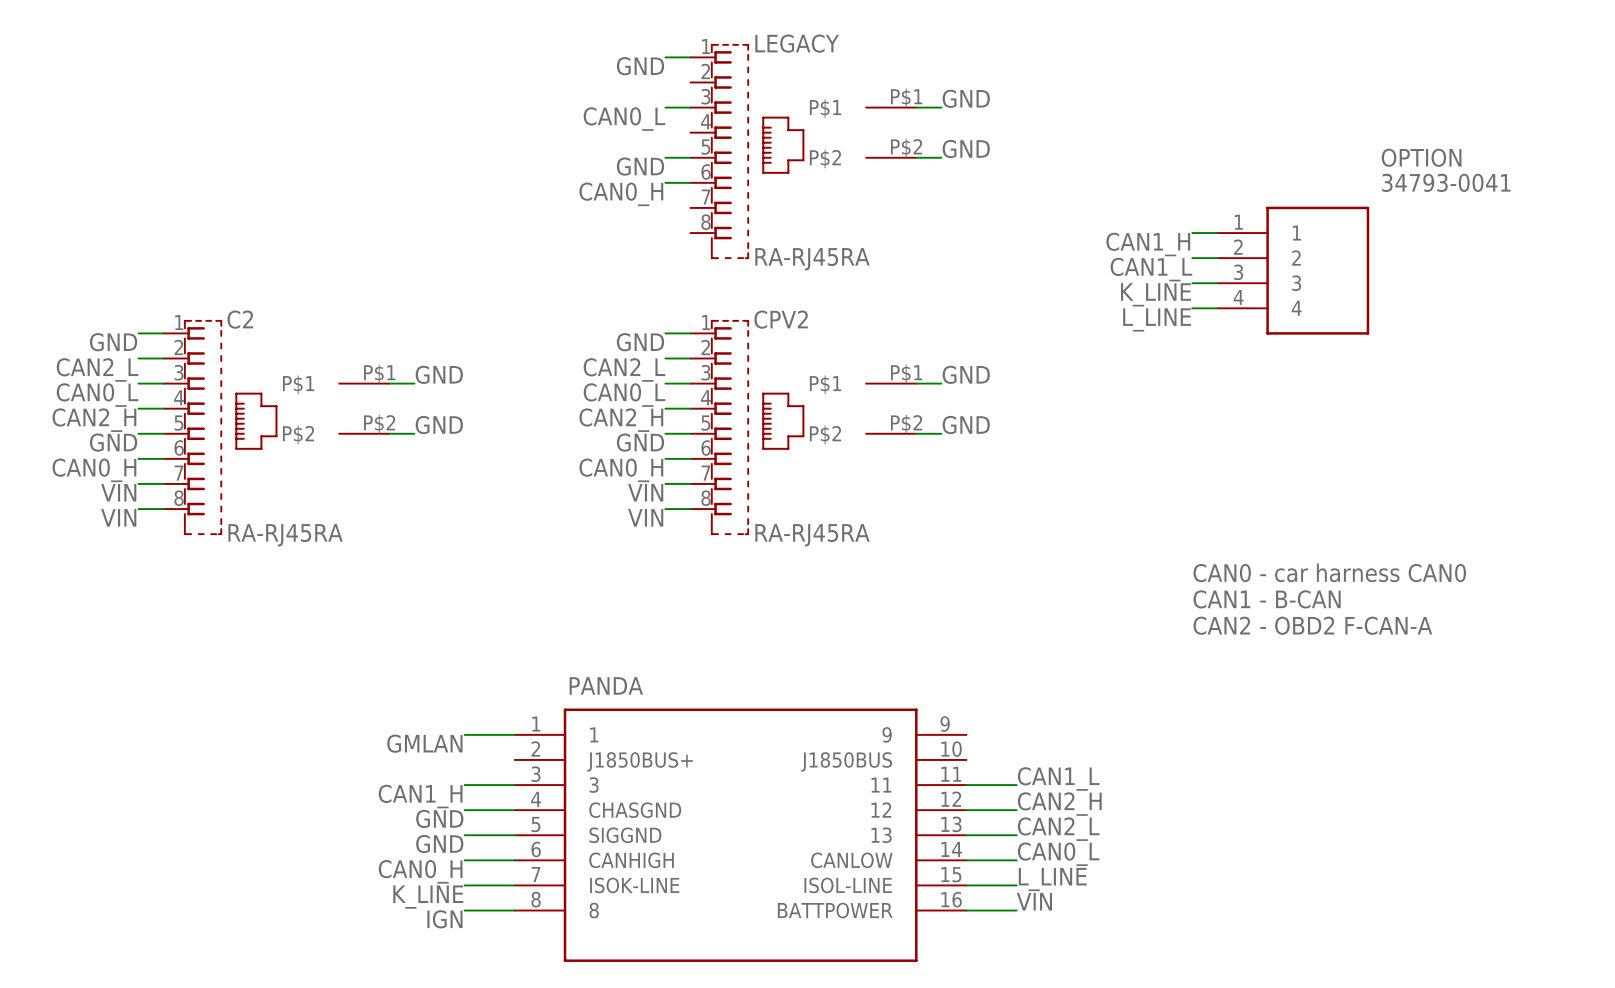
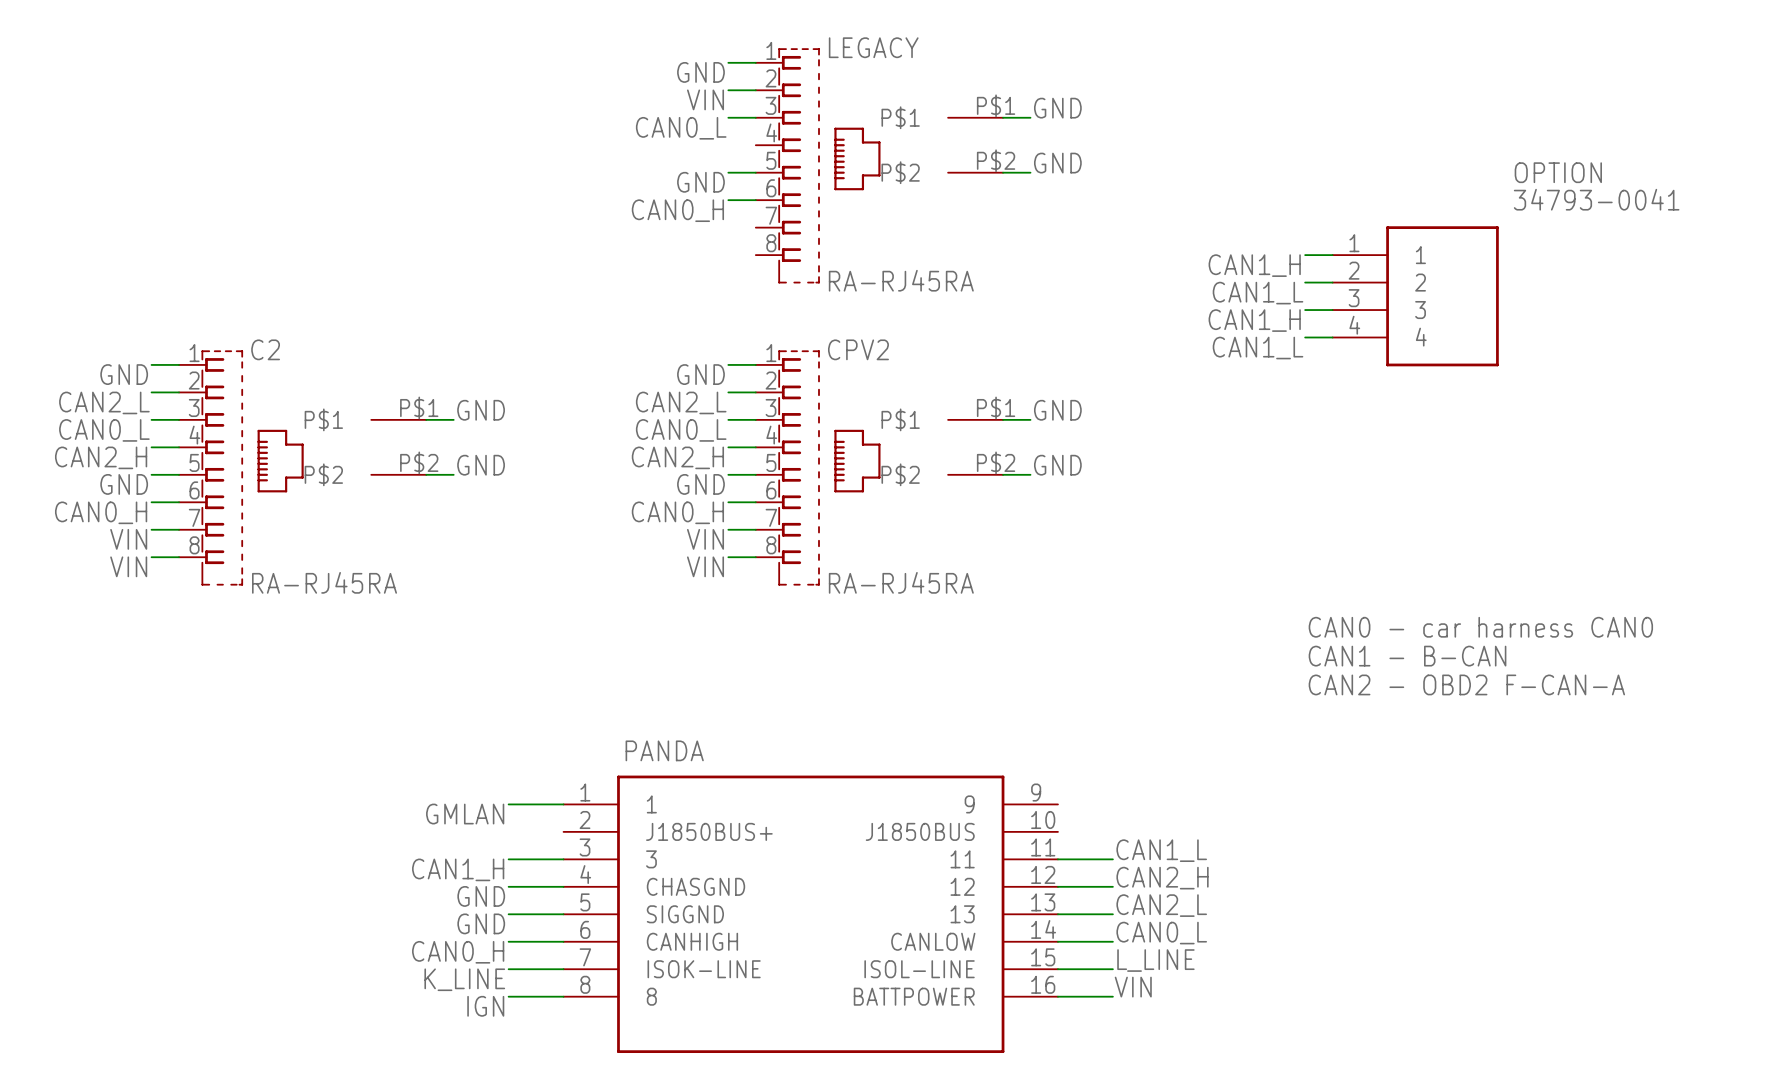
wire: none -> (728, 90) (755, 90)
label: none -> VIN (705, 99)
label: K_LINE (1155, 294) -> CAN1_H (1254, 320)
label: L_LINE (1157, 319) -> CAN1_L (1258, 348)

